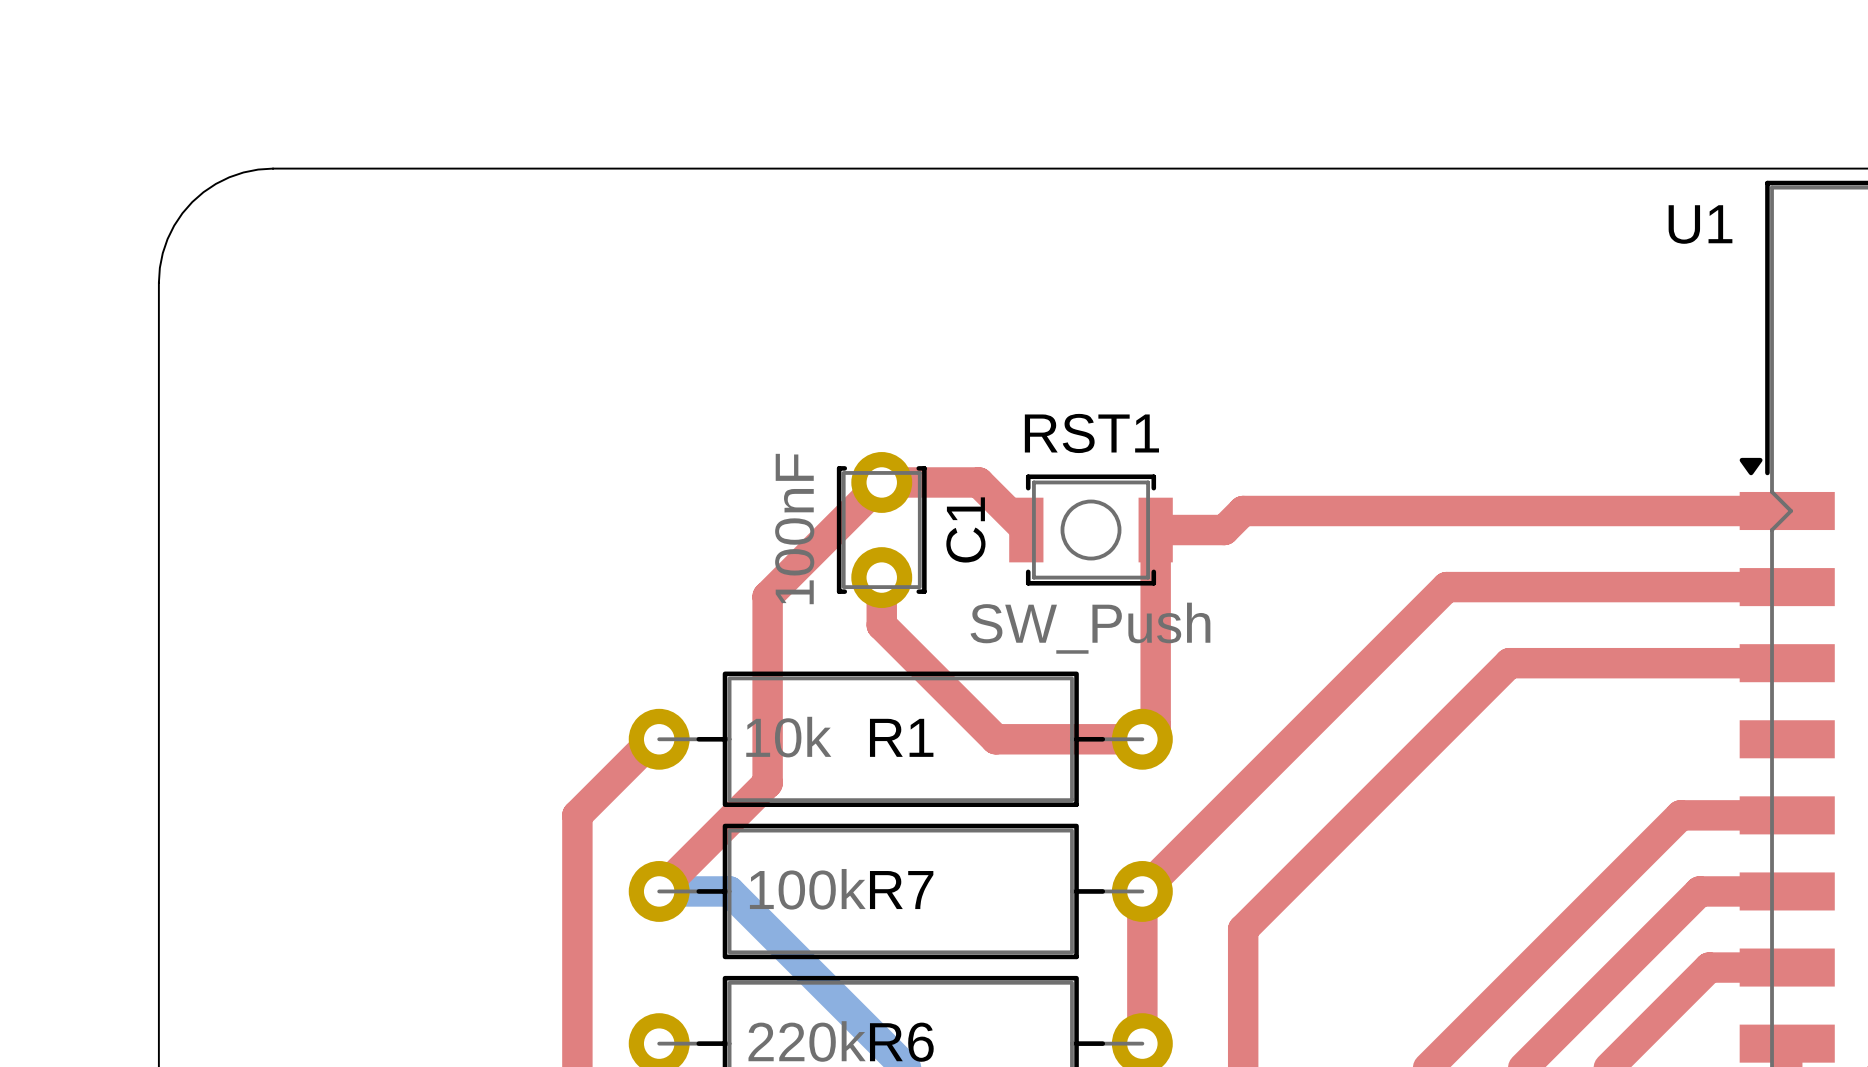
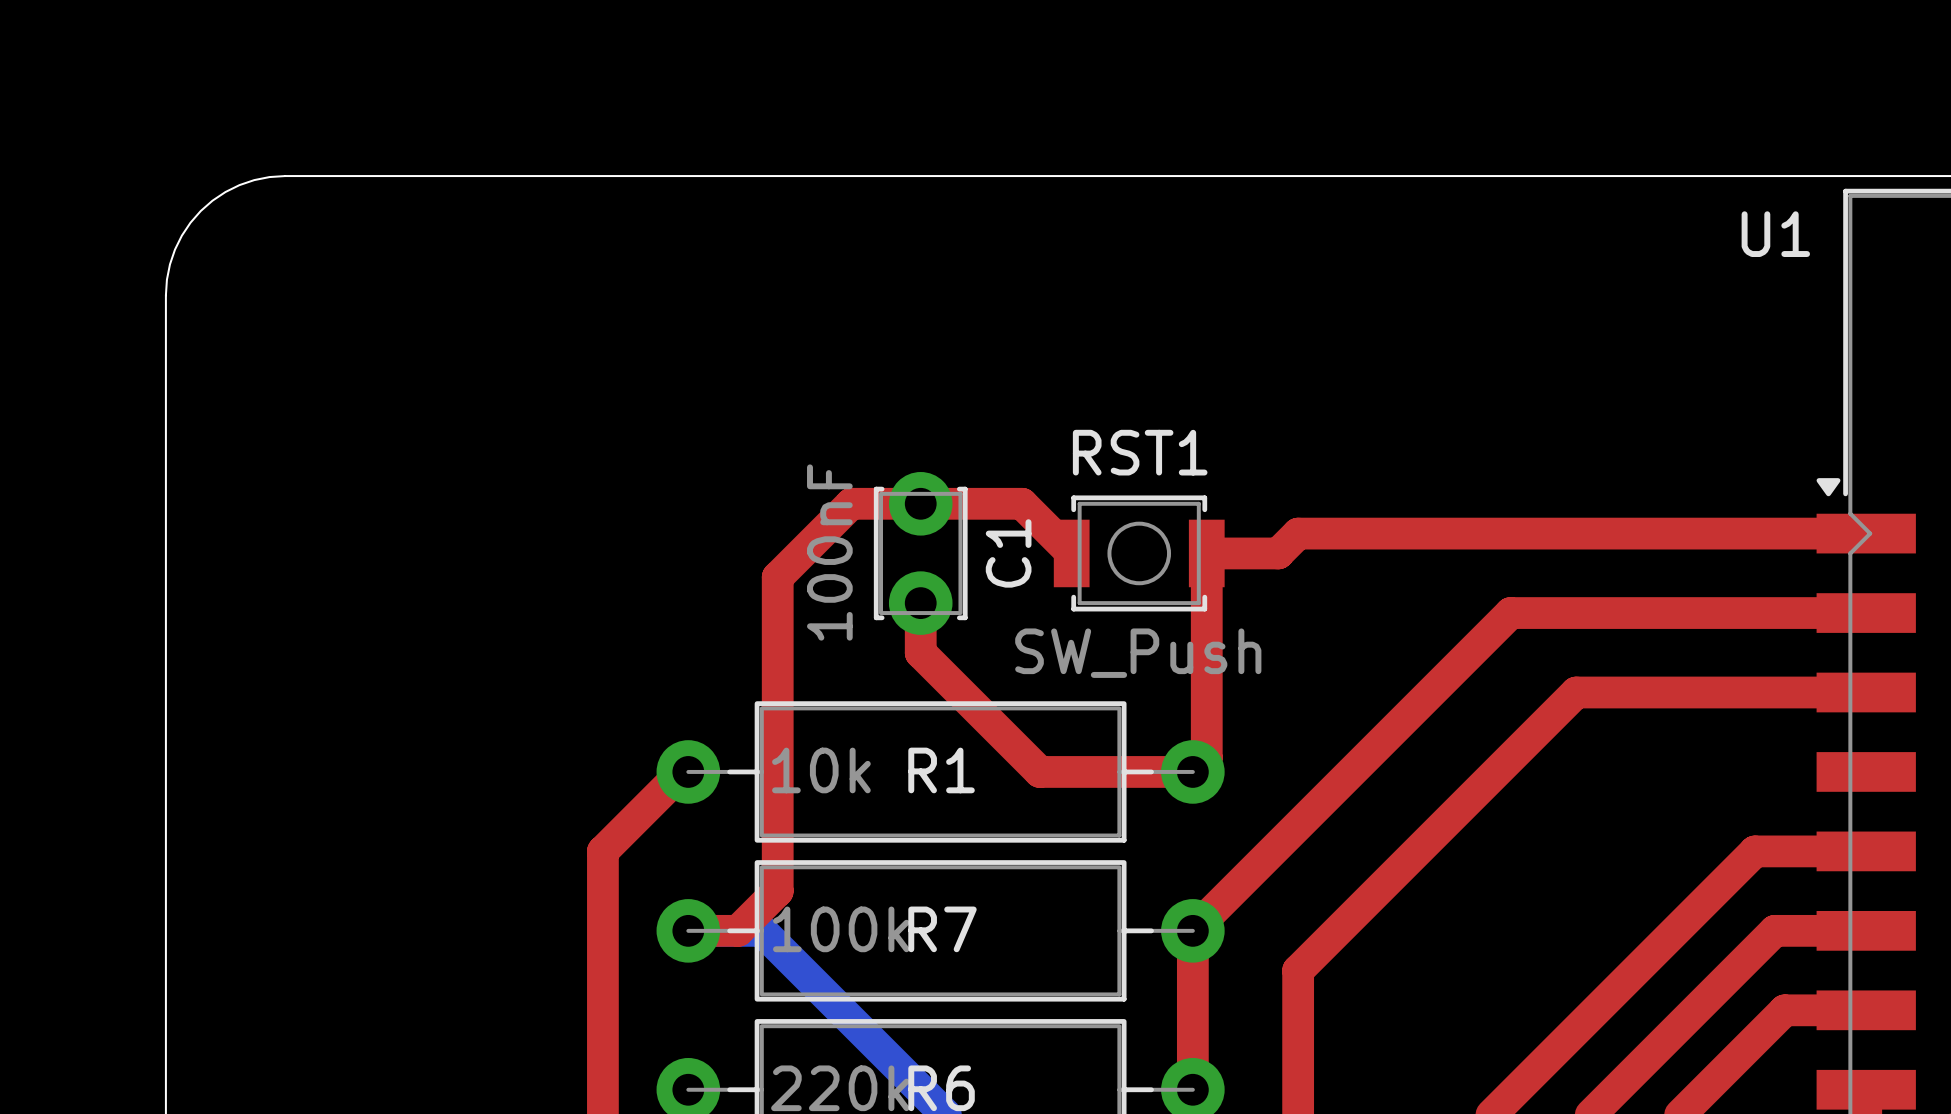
top track: (881, 482) (767, 596) (767, 783) (659, 891) -> (920, 503) (851, 503) (777, 577) (777, 891) (737, 930) (688, 930)

